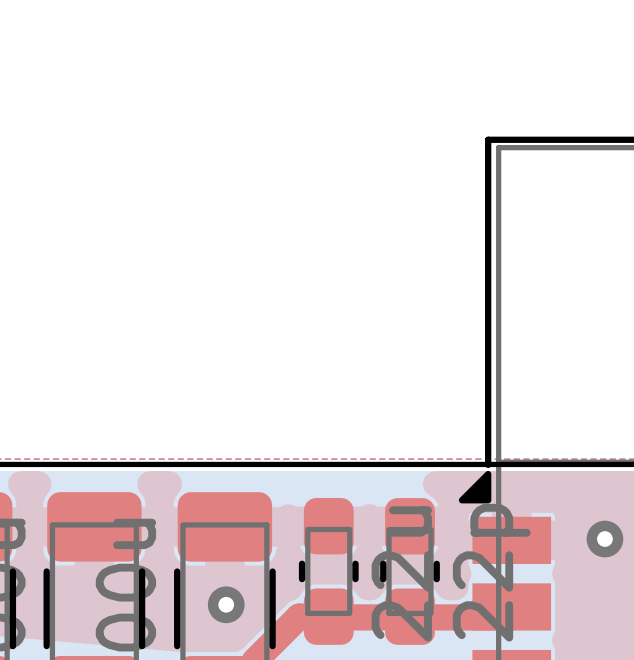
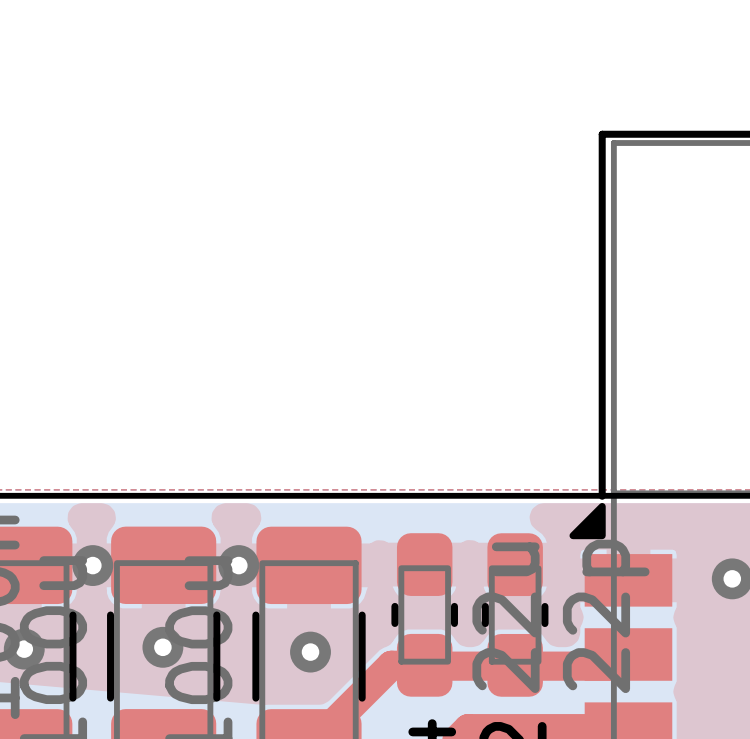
via: none -> (92, 565)
via: none -> (238, 565)
via: none -> (162, 647)

